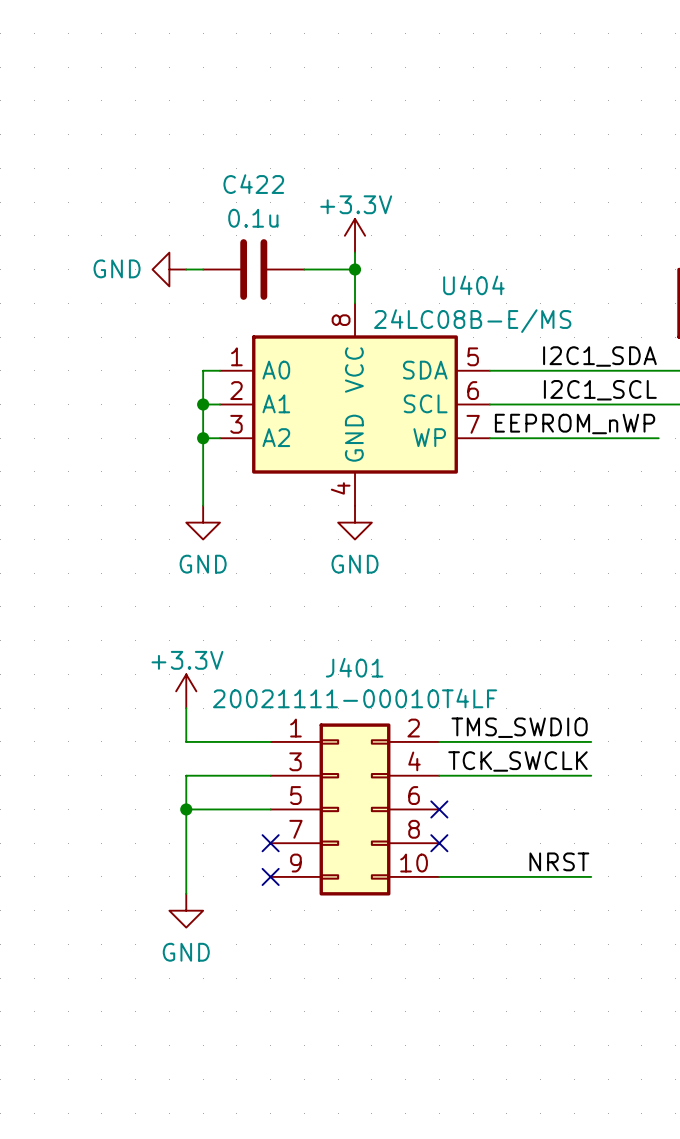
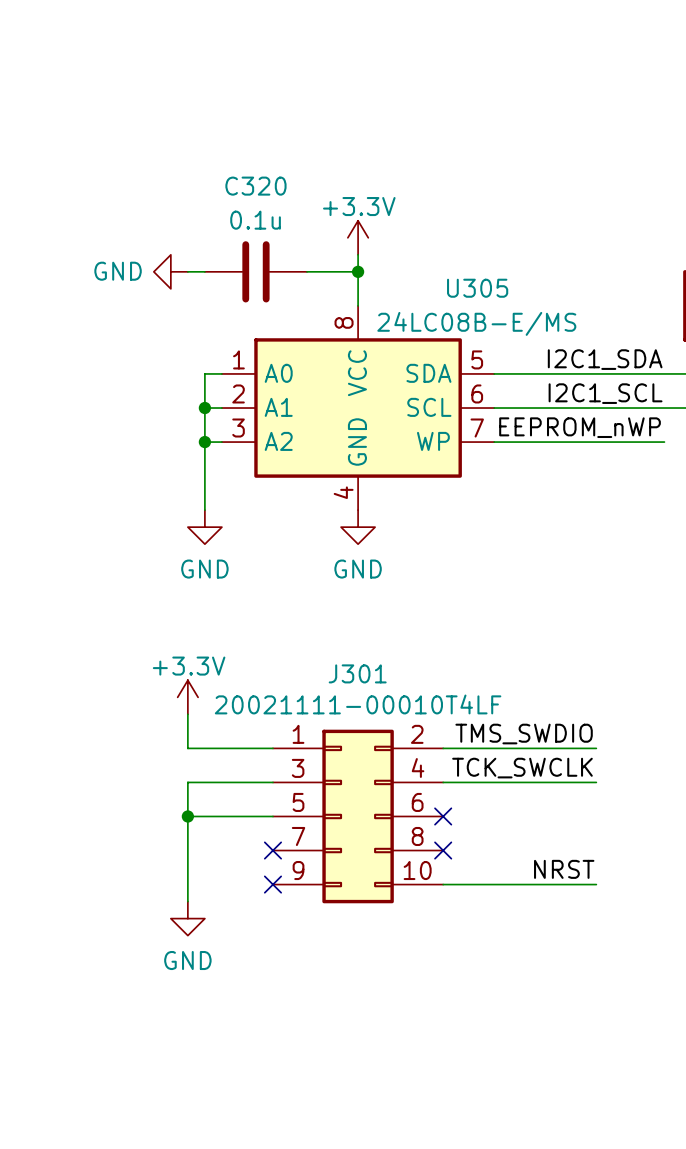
C422 name: C422 (253, 184) -> C320 (255, 186)
U404 name: U404 (473, 285) -> U305 (477, 288)
J401 name: J401 (354, 667) -> J301 (357, 673)

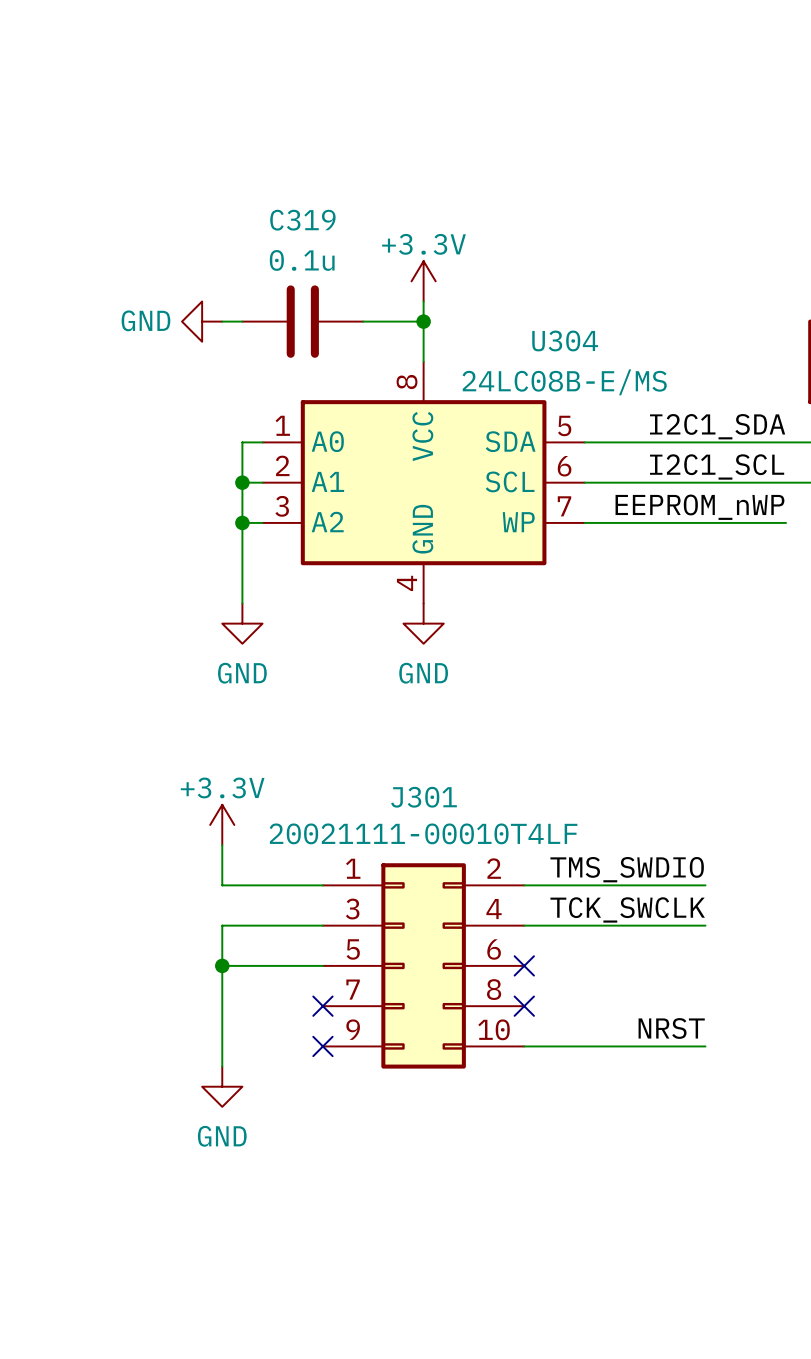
C320 name: C320 (255, 186) -> C319 (302, 220)
U305 name: U305 (477, 288) -> U304 (565, 340)

